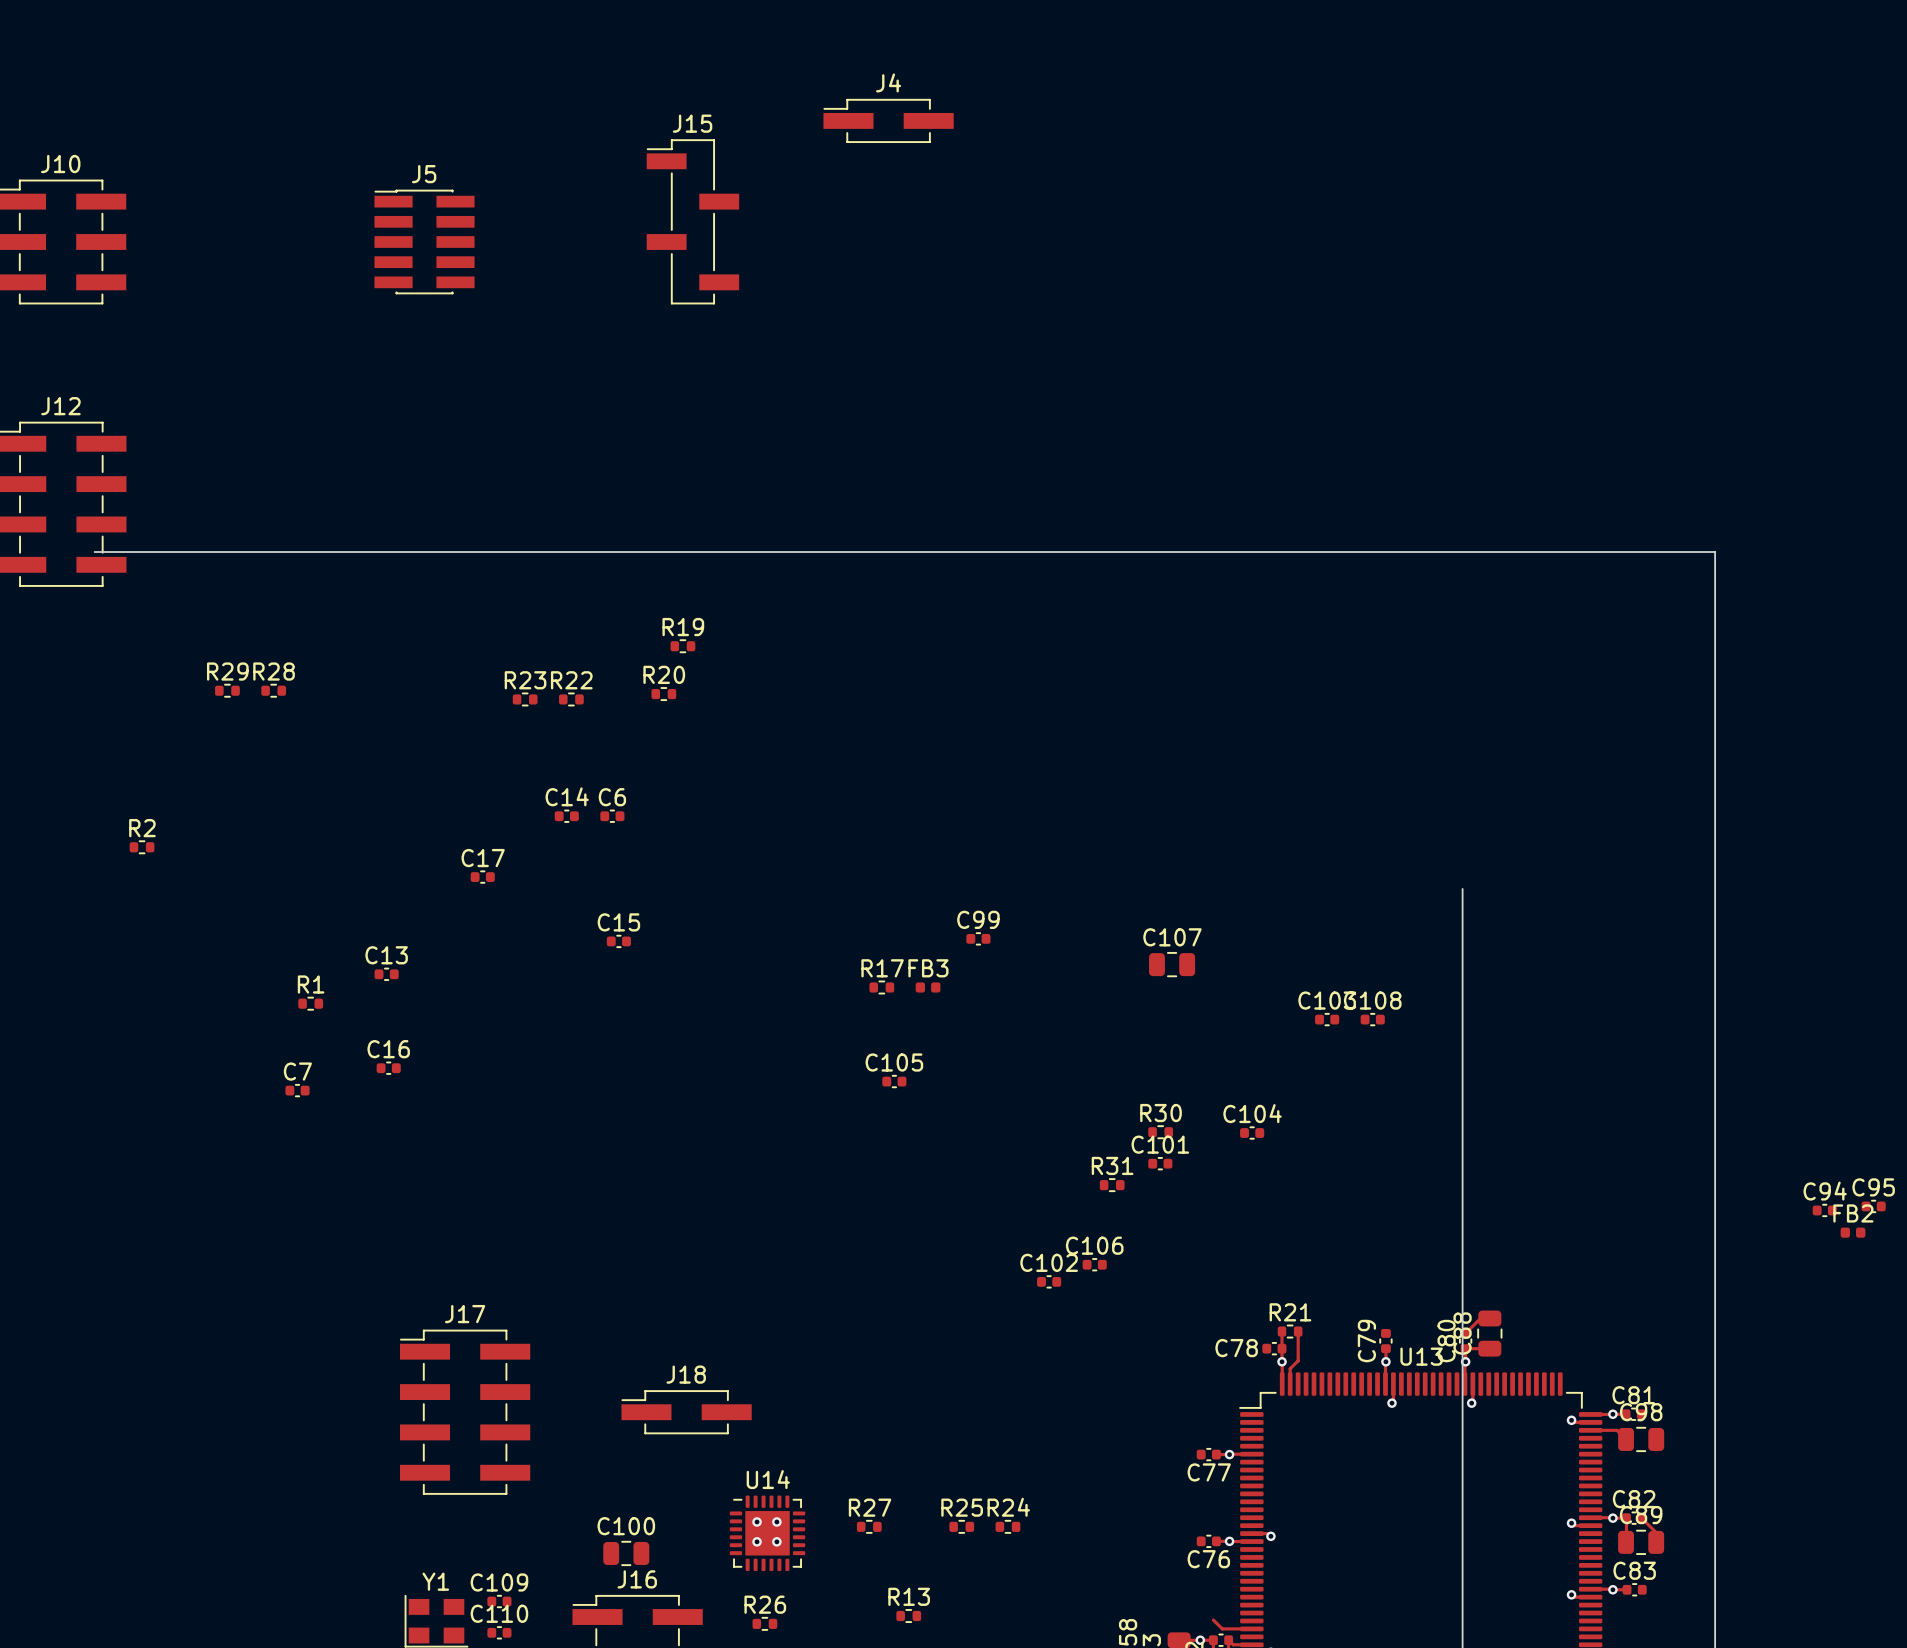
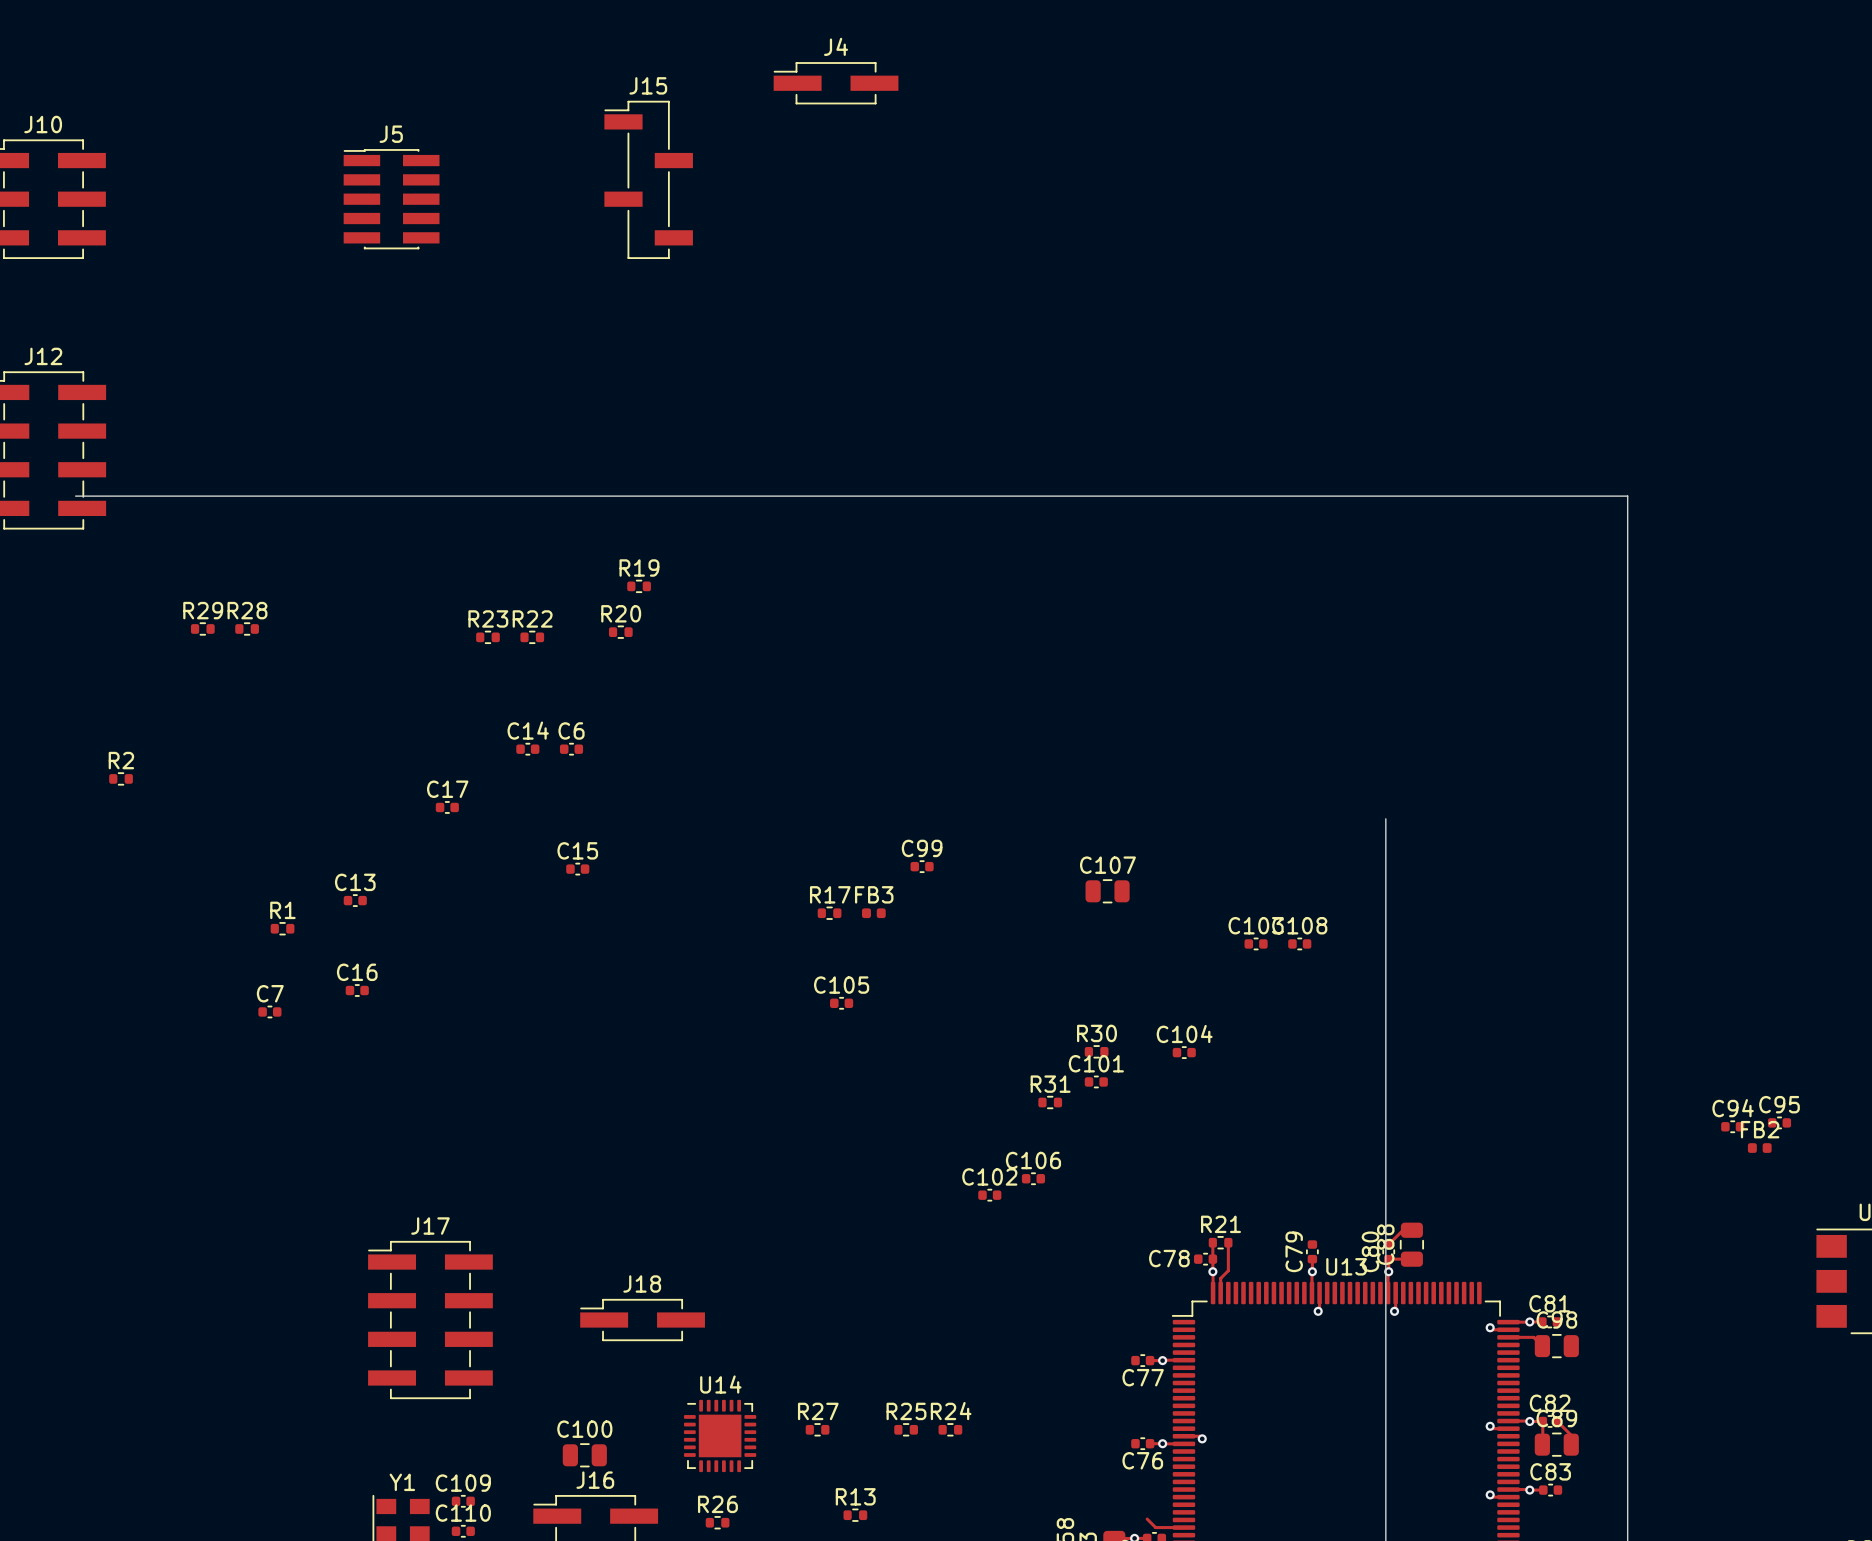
via: (757, 1521) -> none
via: (776, 1521) -> none
via: (757, 1541) -> none
via: (776, 1541) -> none

